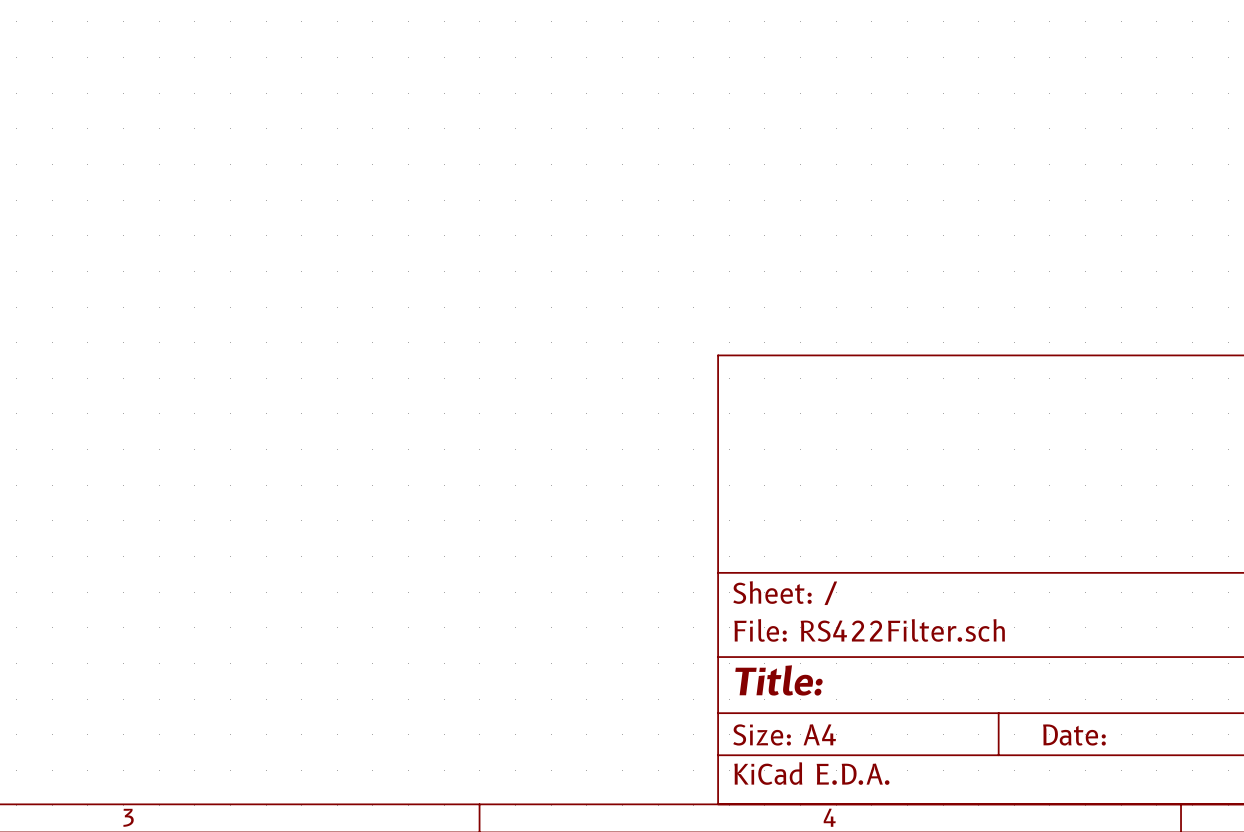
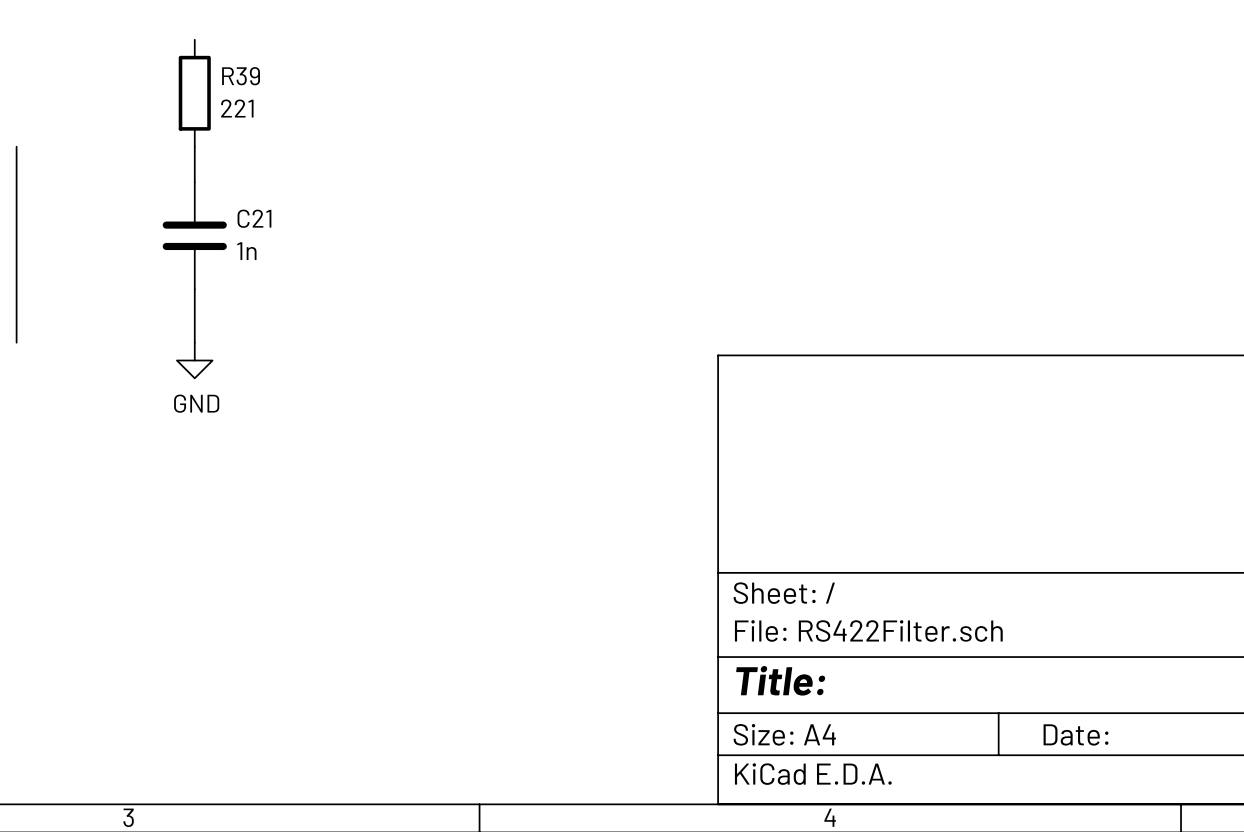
R39: none -> 221 (194, 93)
wire: none -> (16, 146) (16, 342)
wire: none -> (194, 146) (194, 182)
C21: none -> 1n (194, 235)
wire: none -> (194, 289) (194, 342)
power symbol: none -> GND (194, 360)

